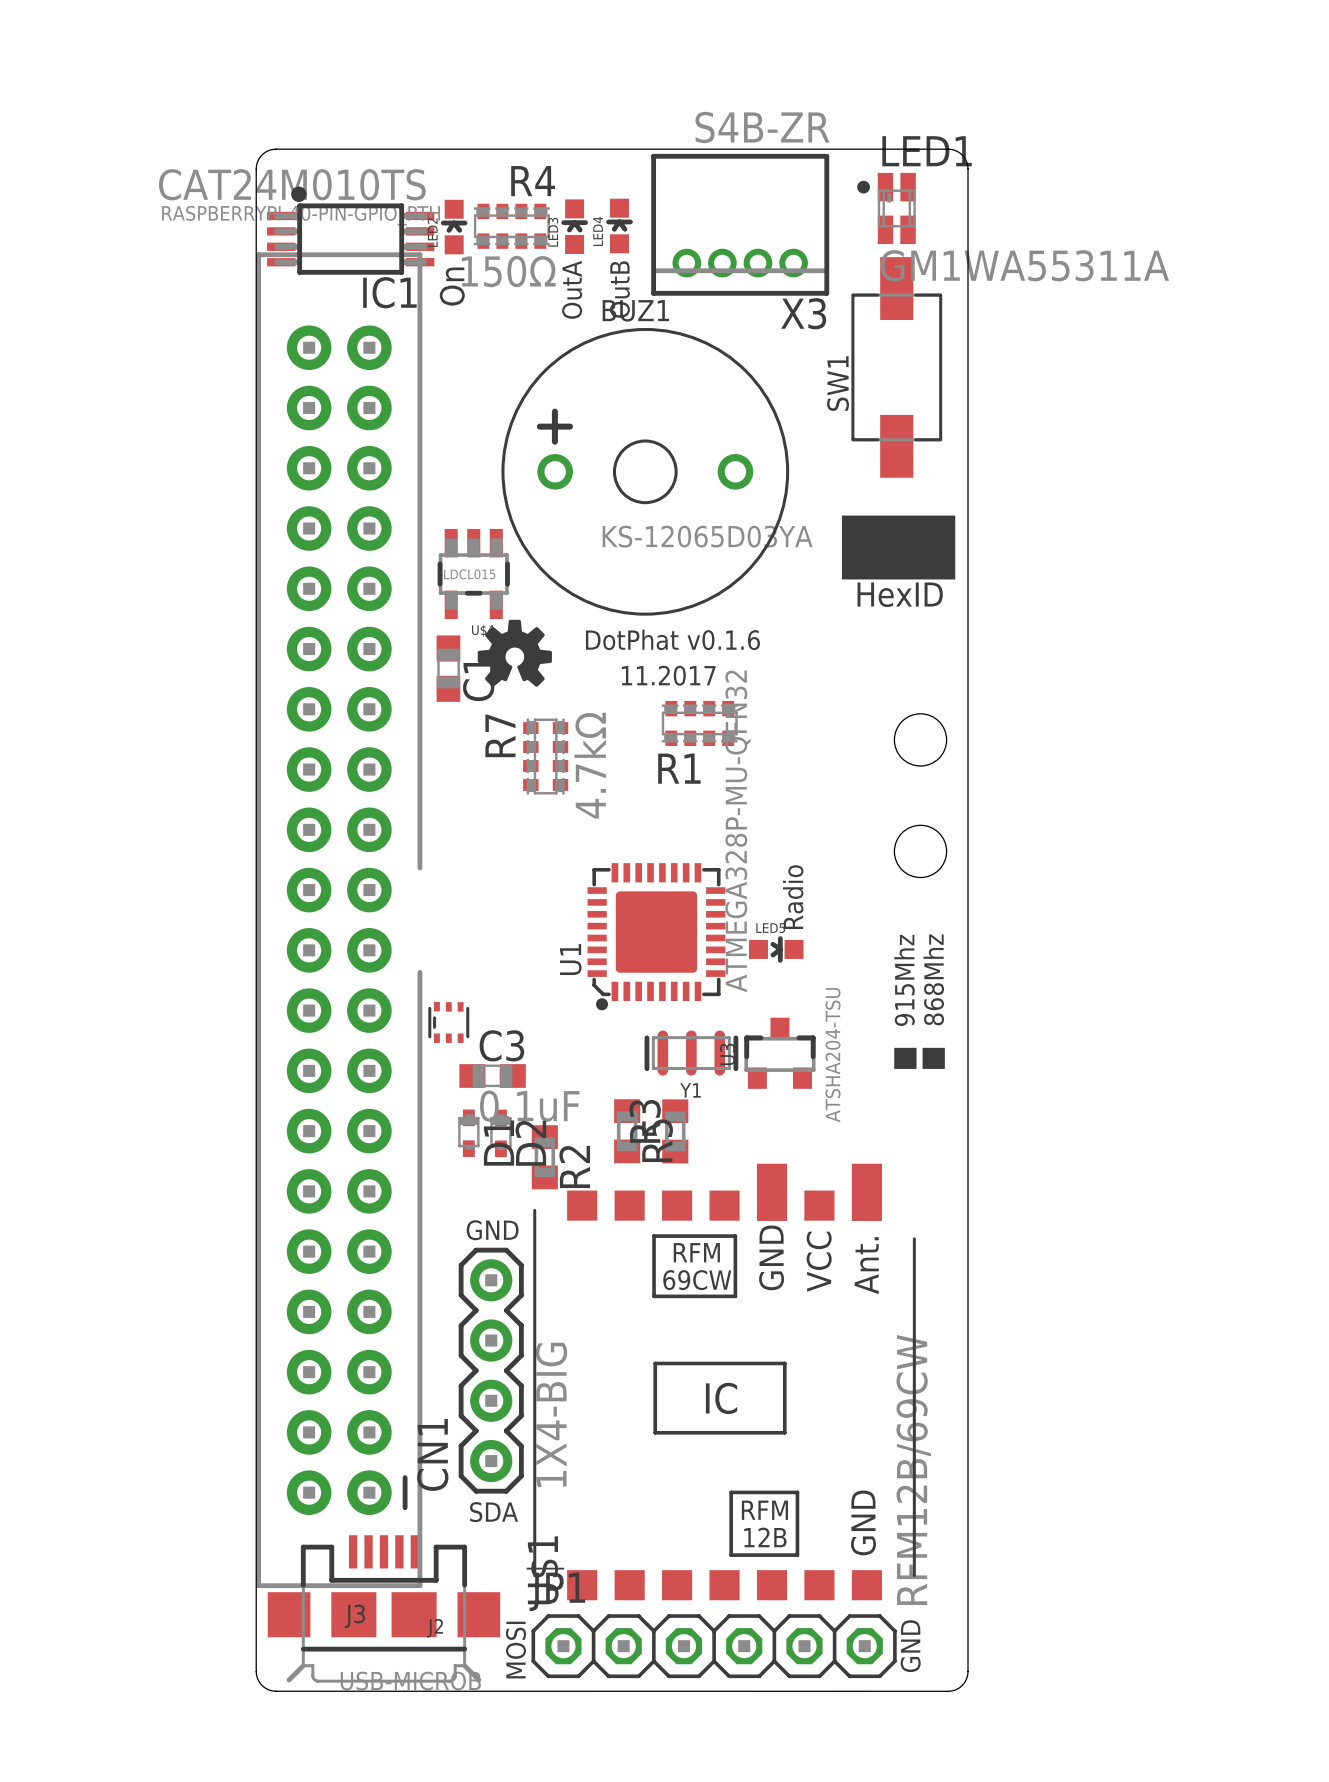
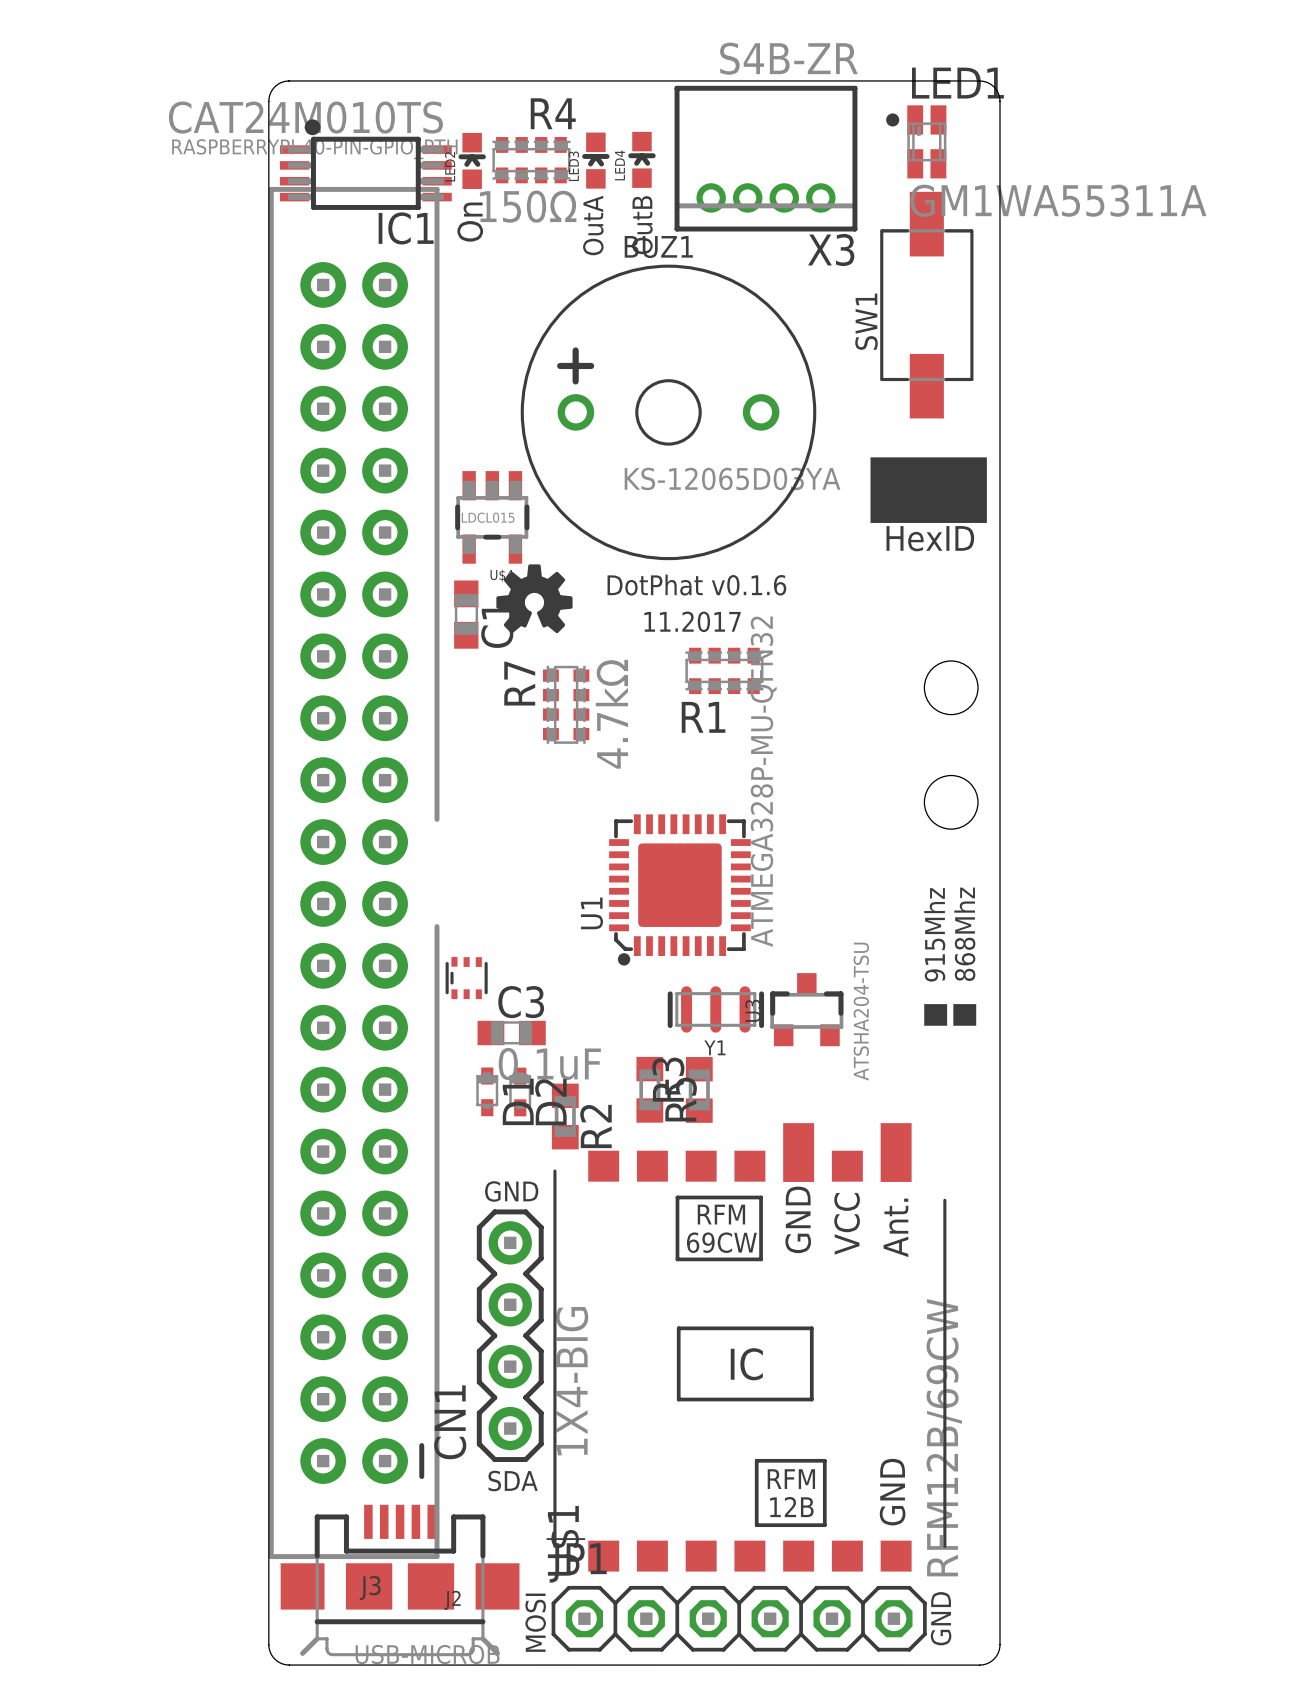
text: Radio (793, 897) -> none
LED5: (776, 949) -> none

